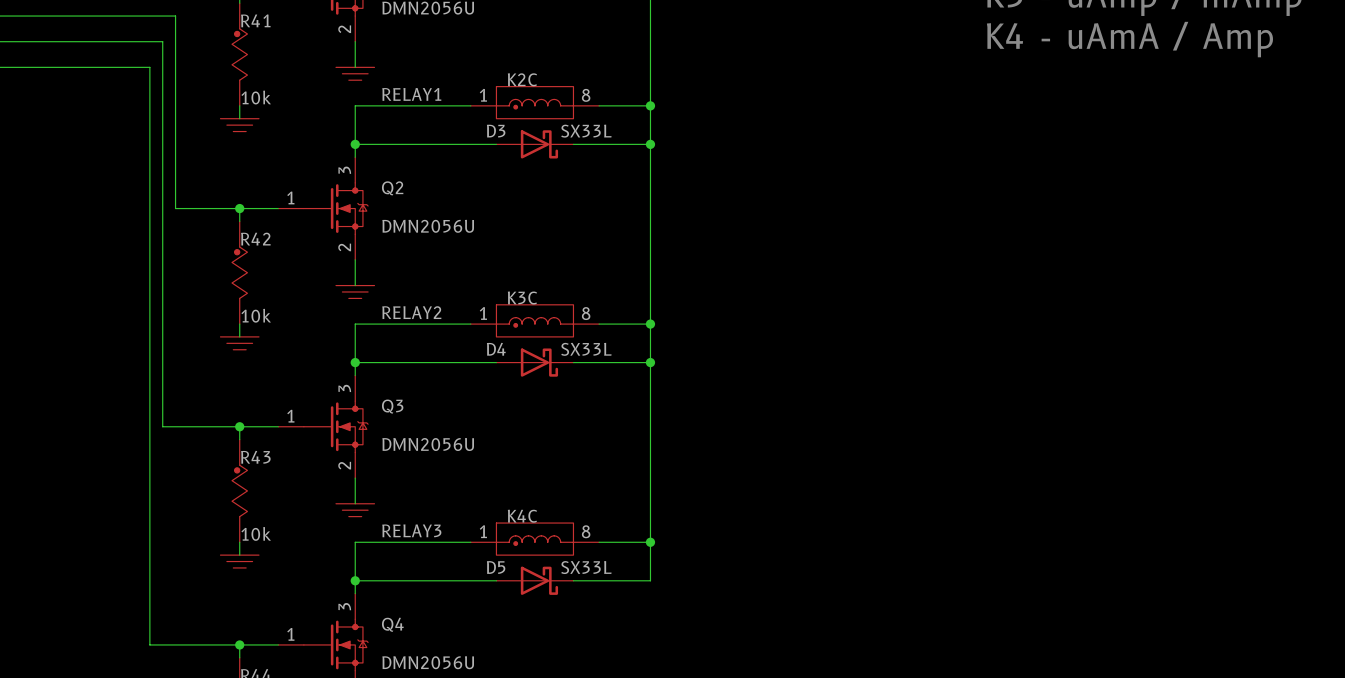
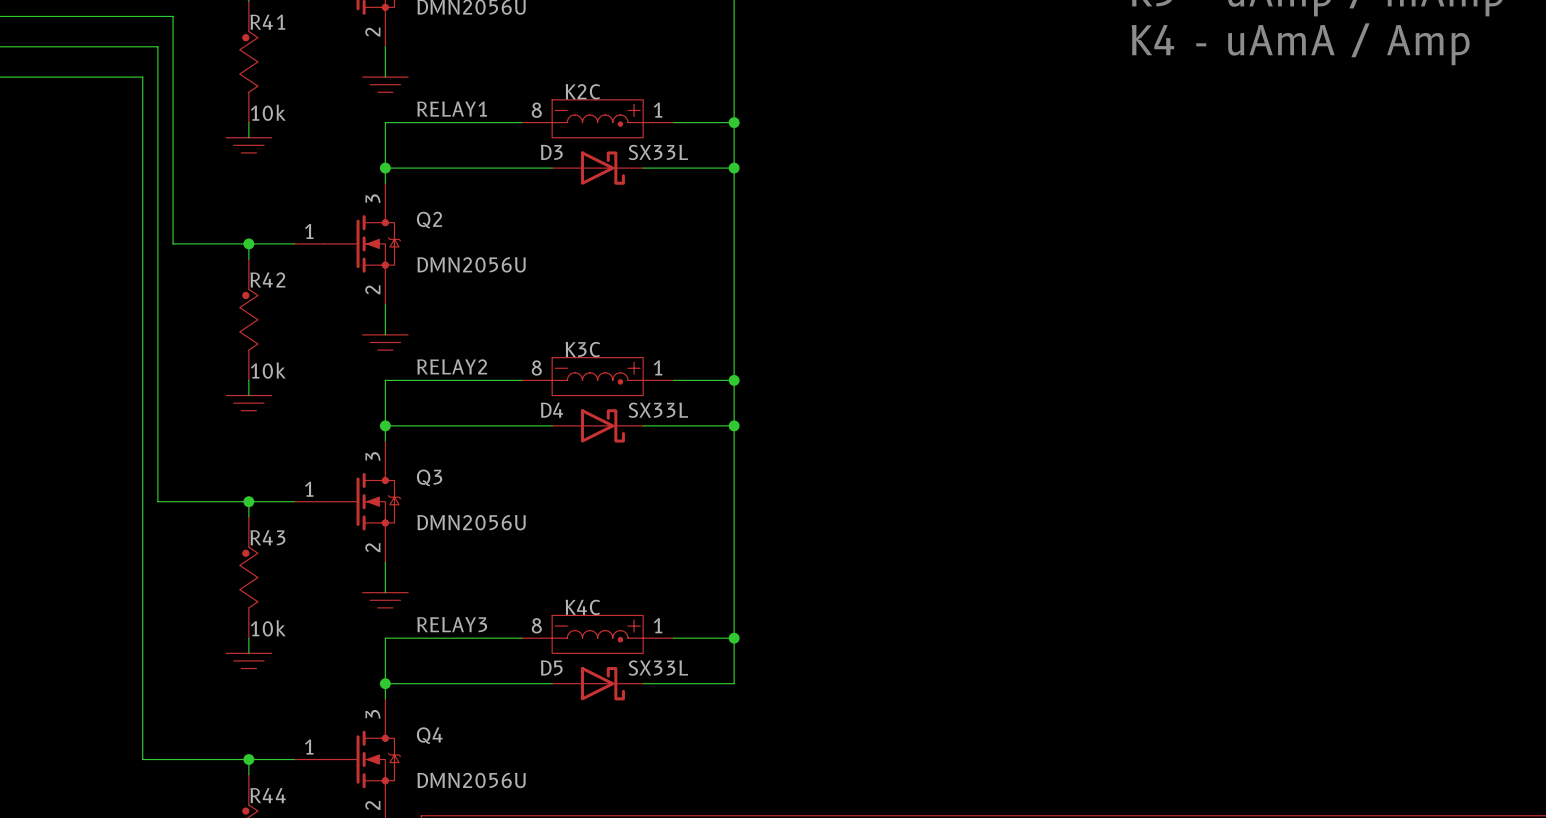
K2C symbol: [470, 86, 600, 119] -> [521, 99, 674, 138]
K3C symbol: [470, 304, 600, 337] -> [521, 357, 674, 396]
K4C symbol: [470, 523, 600, 556] -> [521, 615, 674, 654]

